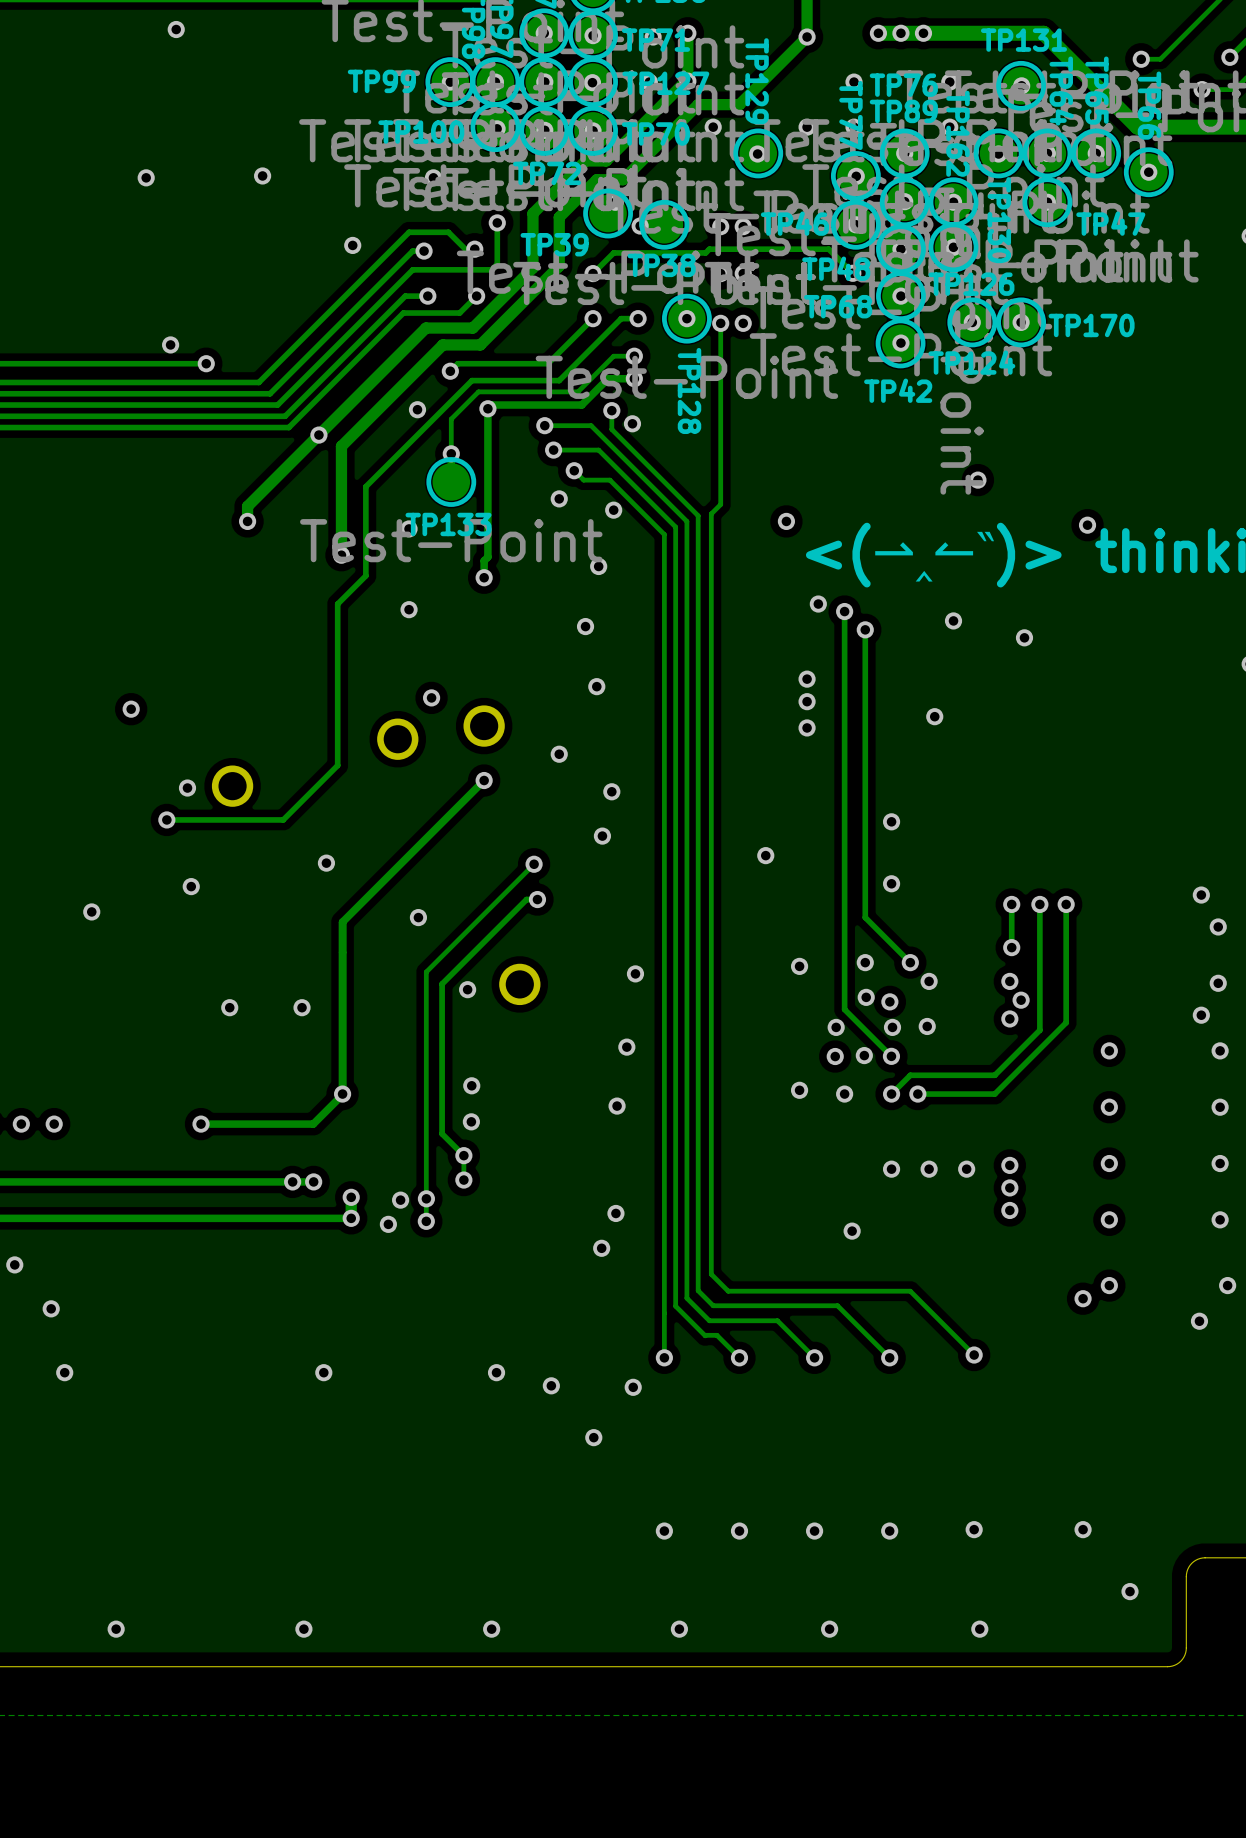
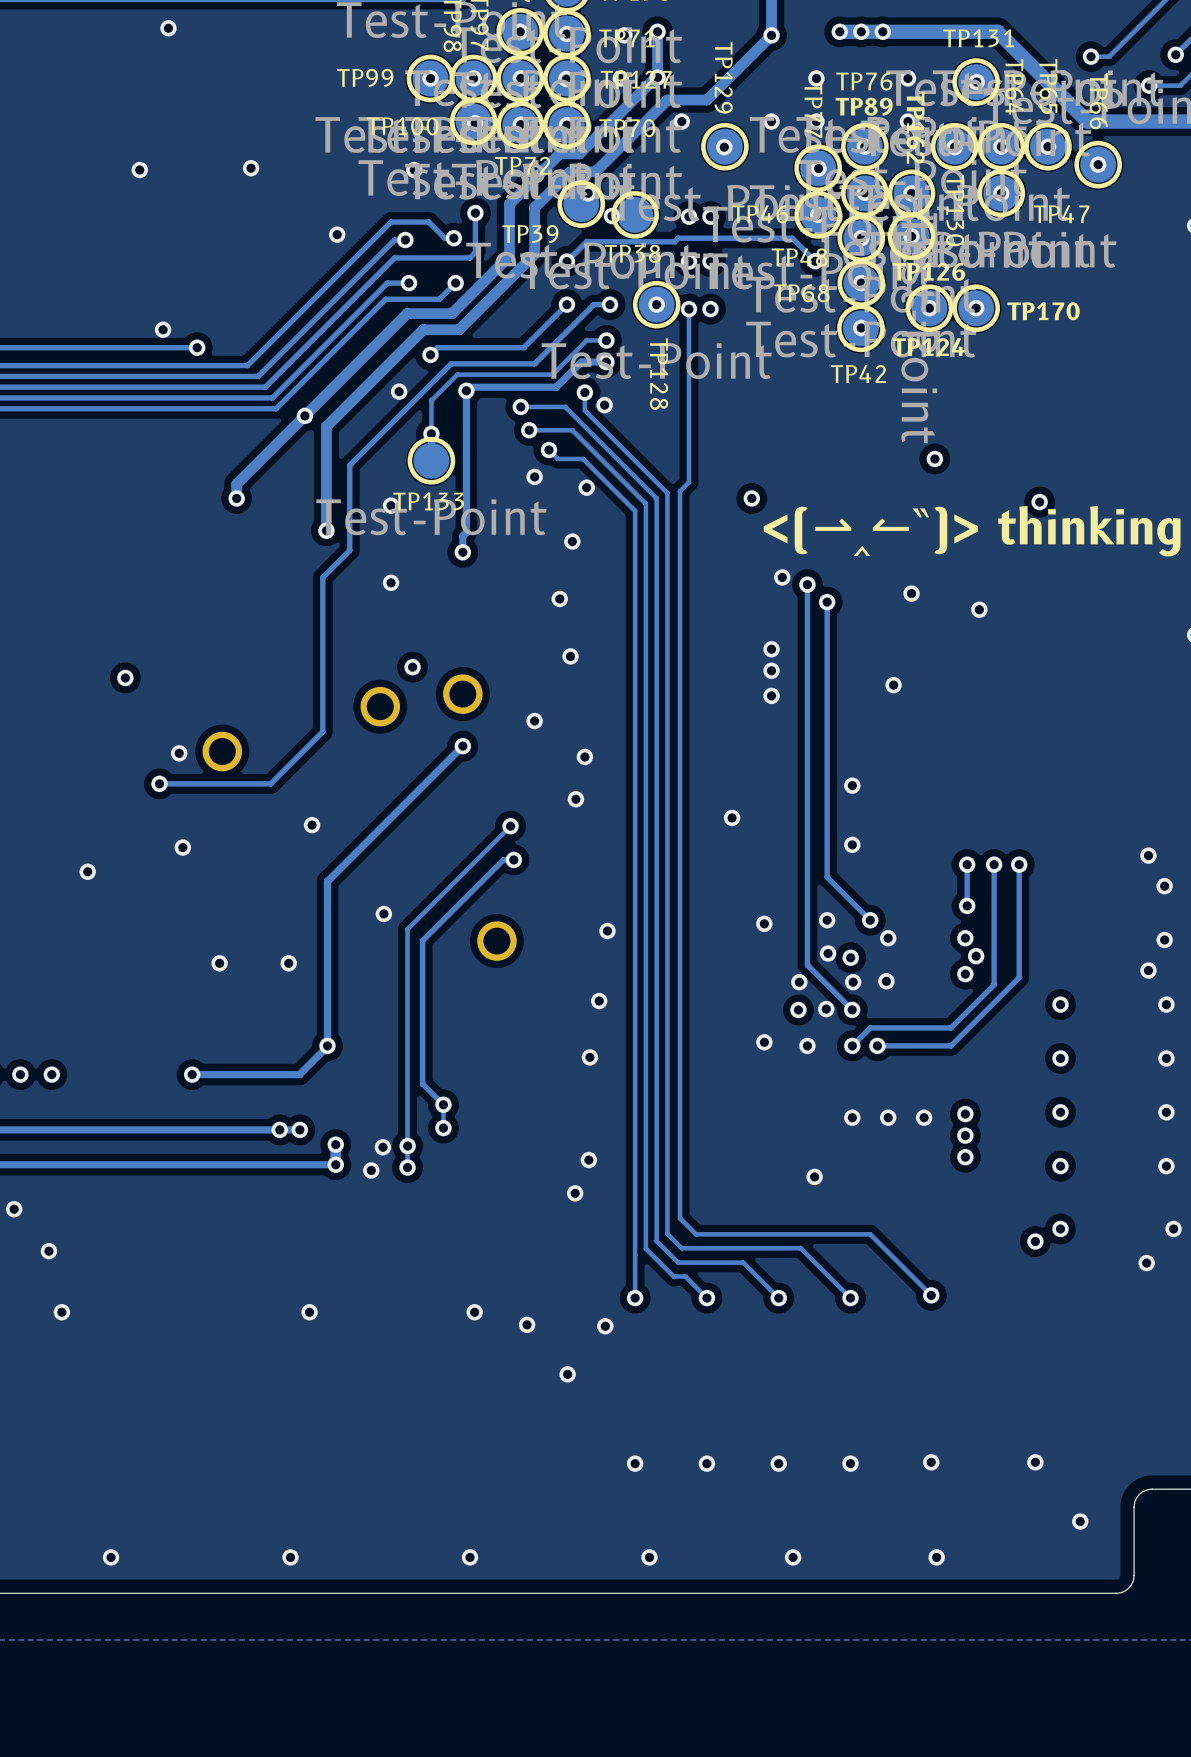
via: (418, 917) -> none
via: none -> (383, 913)
via: (467, 989) -> none
via: (471, 1085) -> none
via: (471, 1121) -> none

